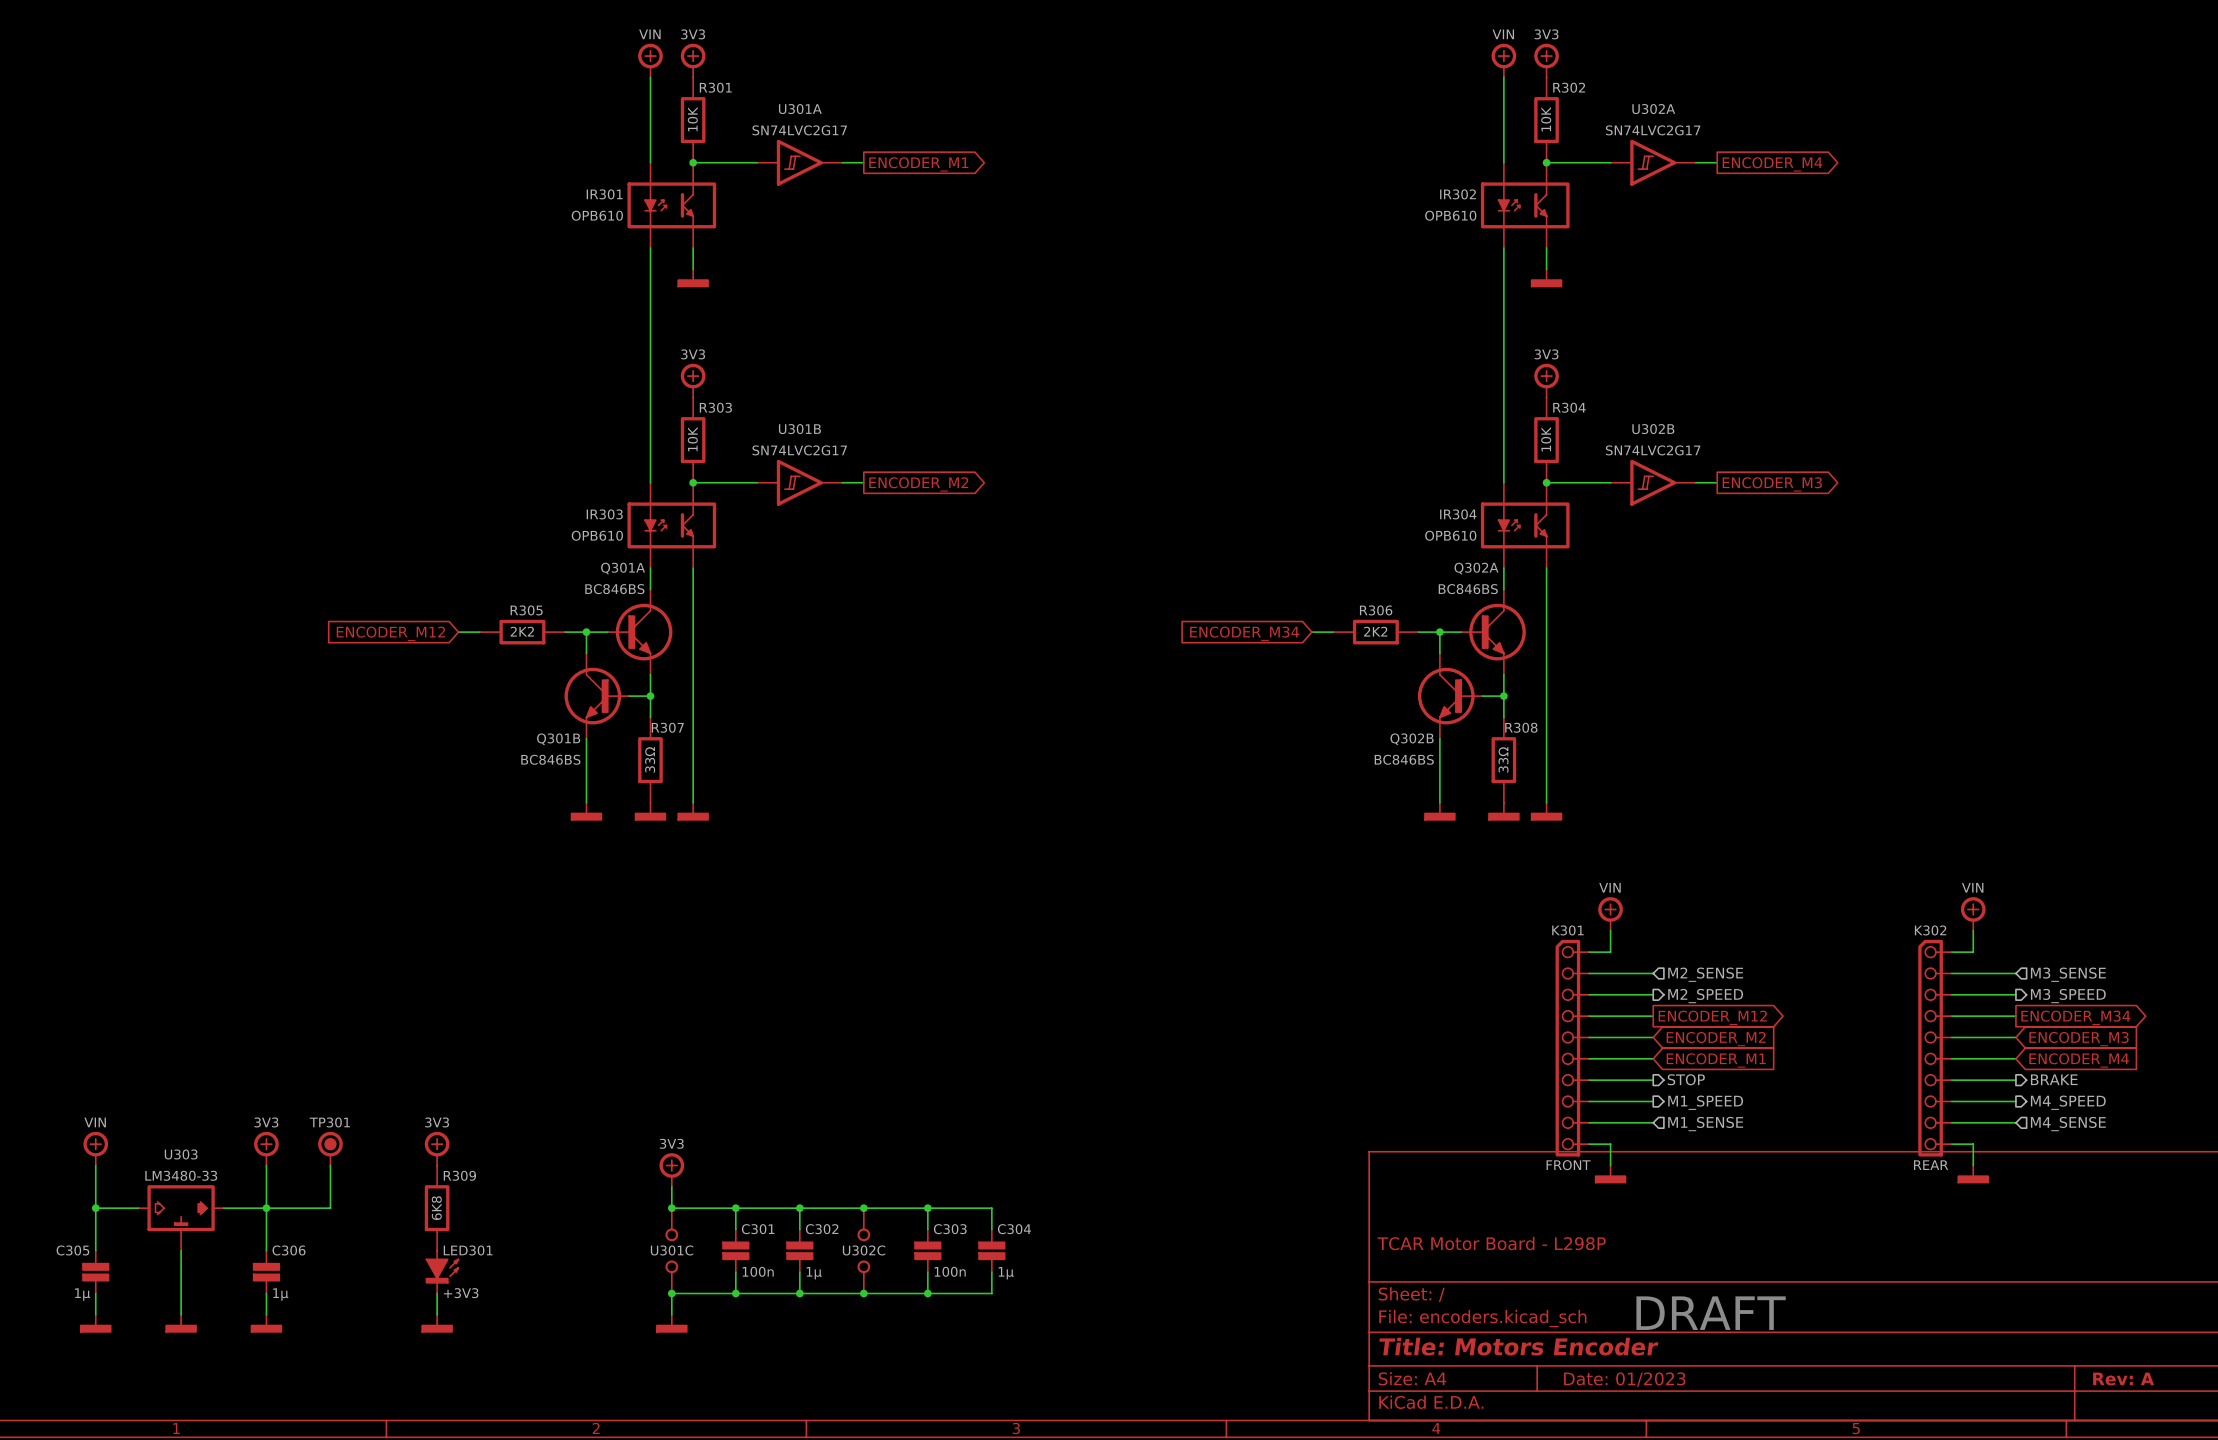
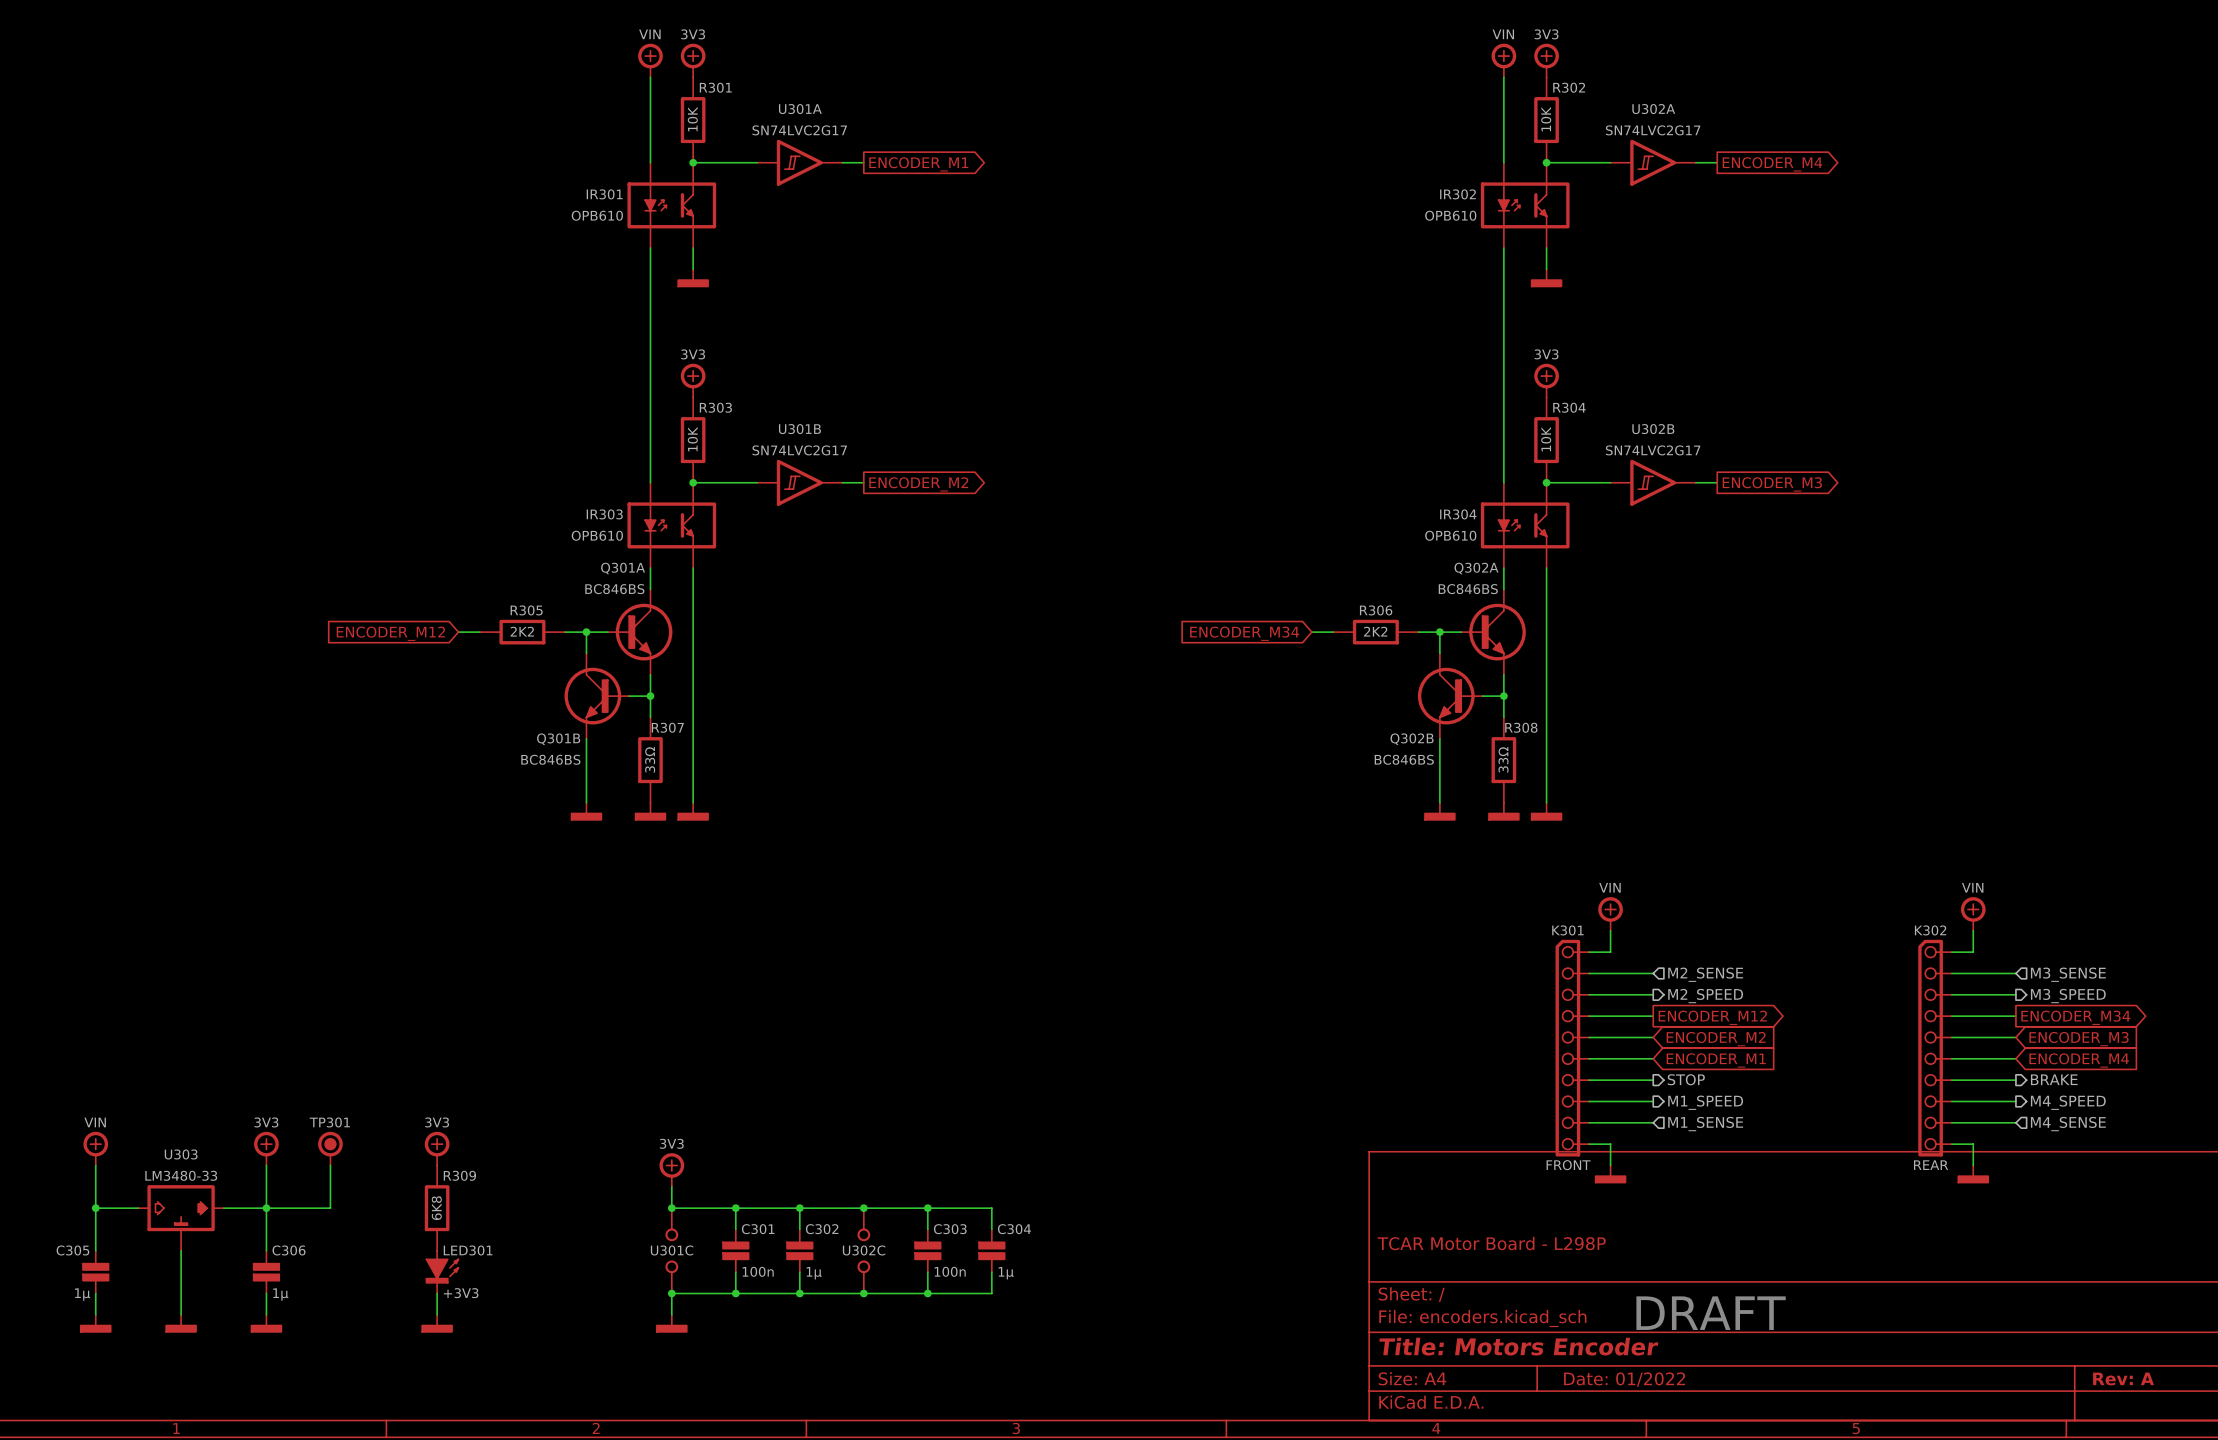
title block: Date: 01/2023 (1624, 1379) -> Date: 01/2022 (1624, 1379)

